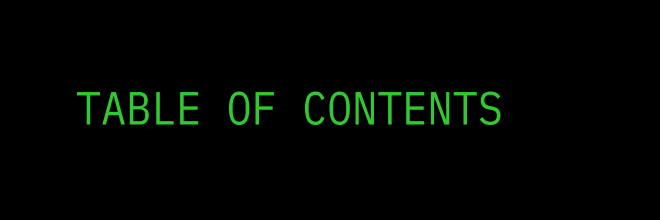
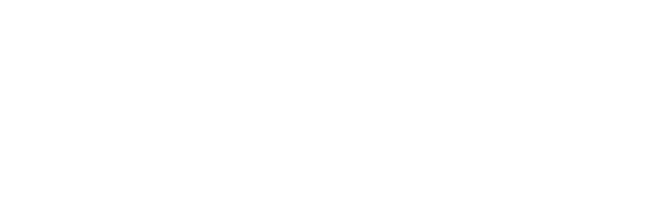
text: TABLE OF CONTENTS (288, 108) -> none

